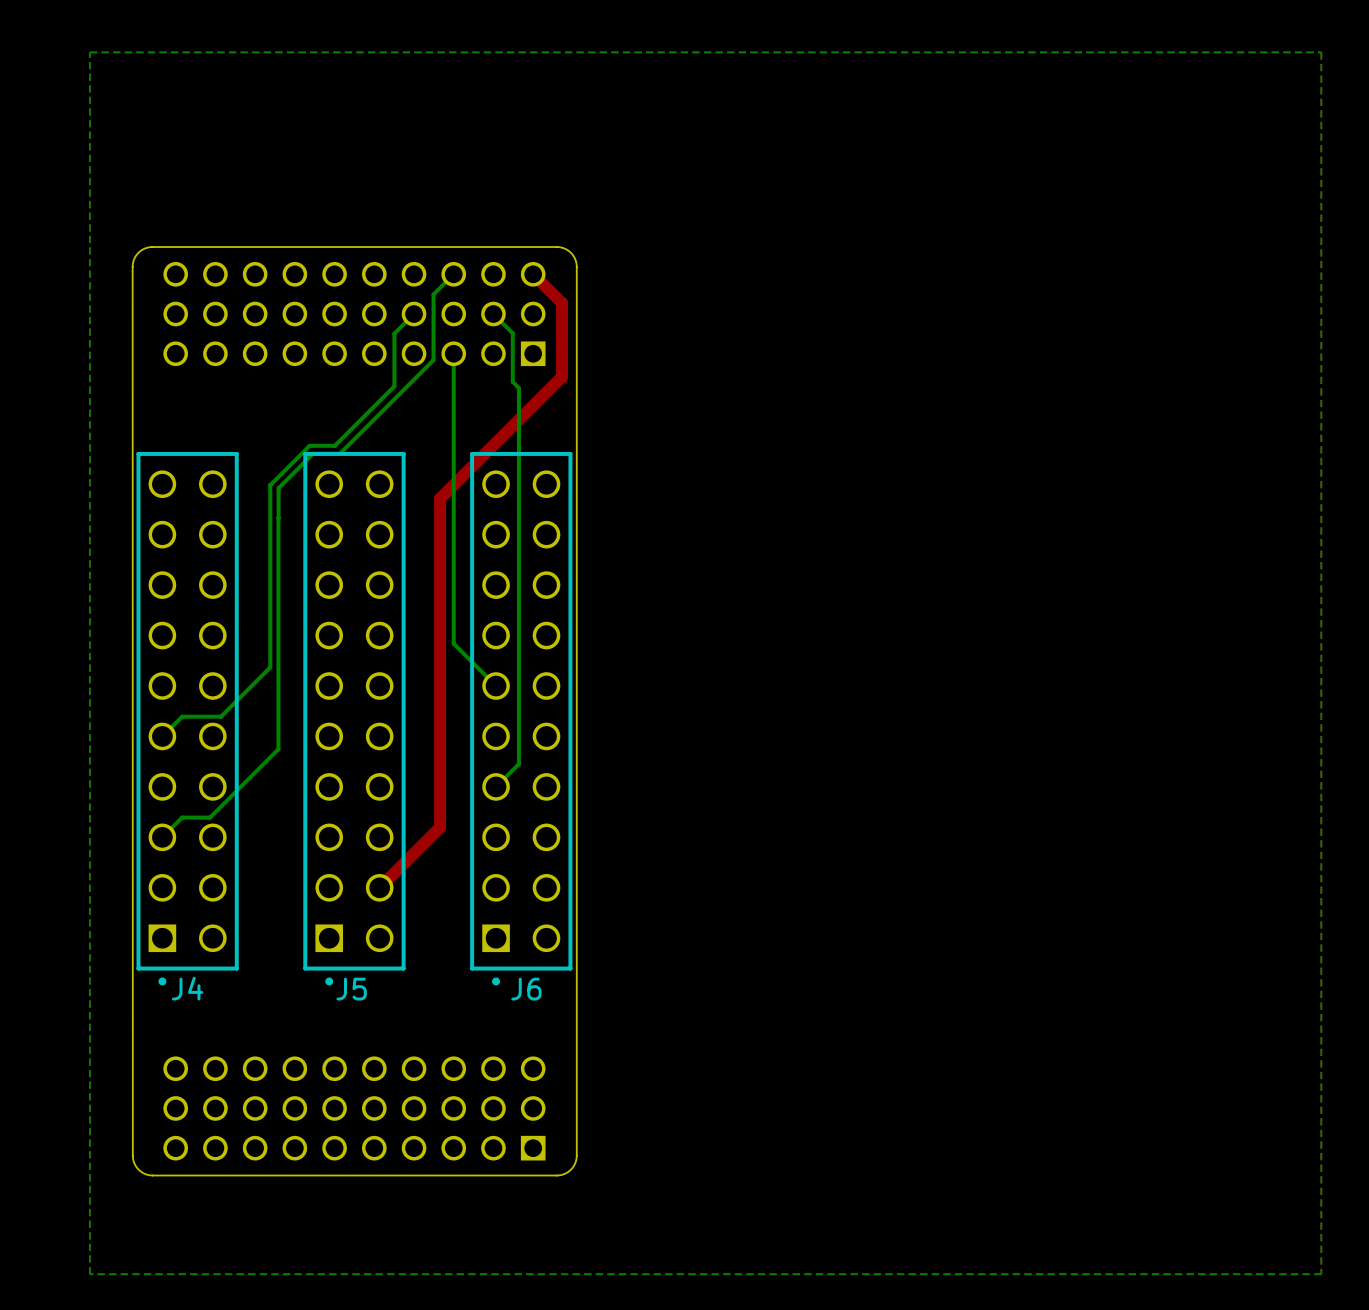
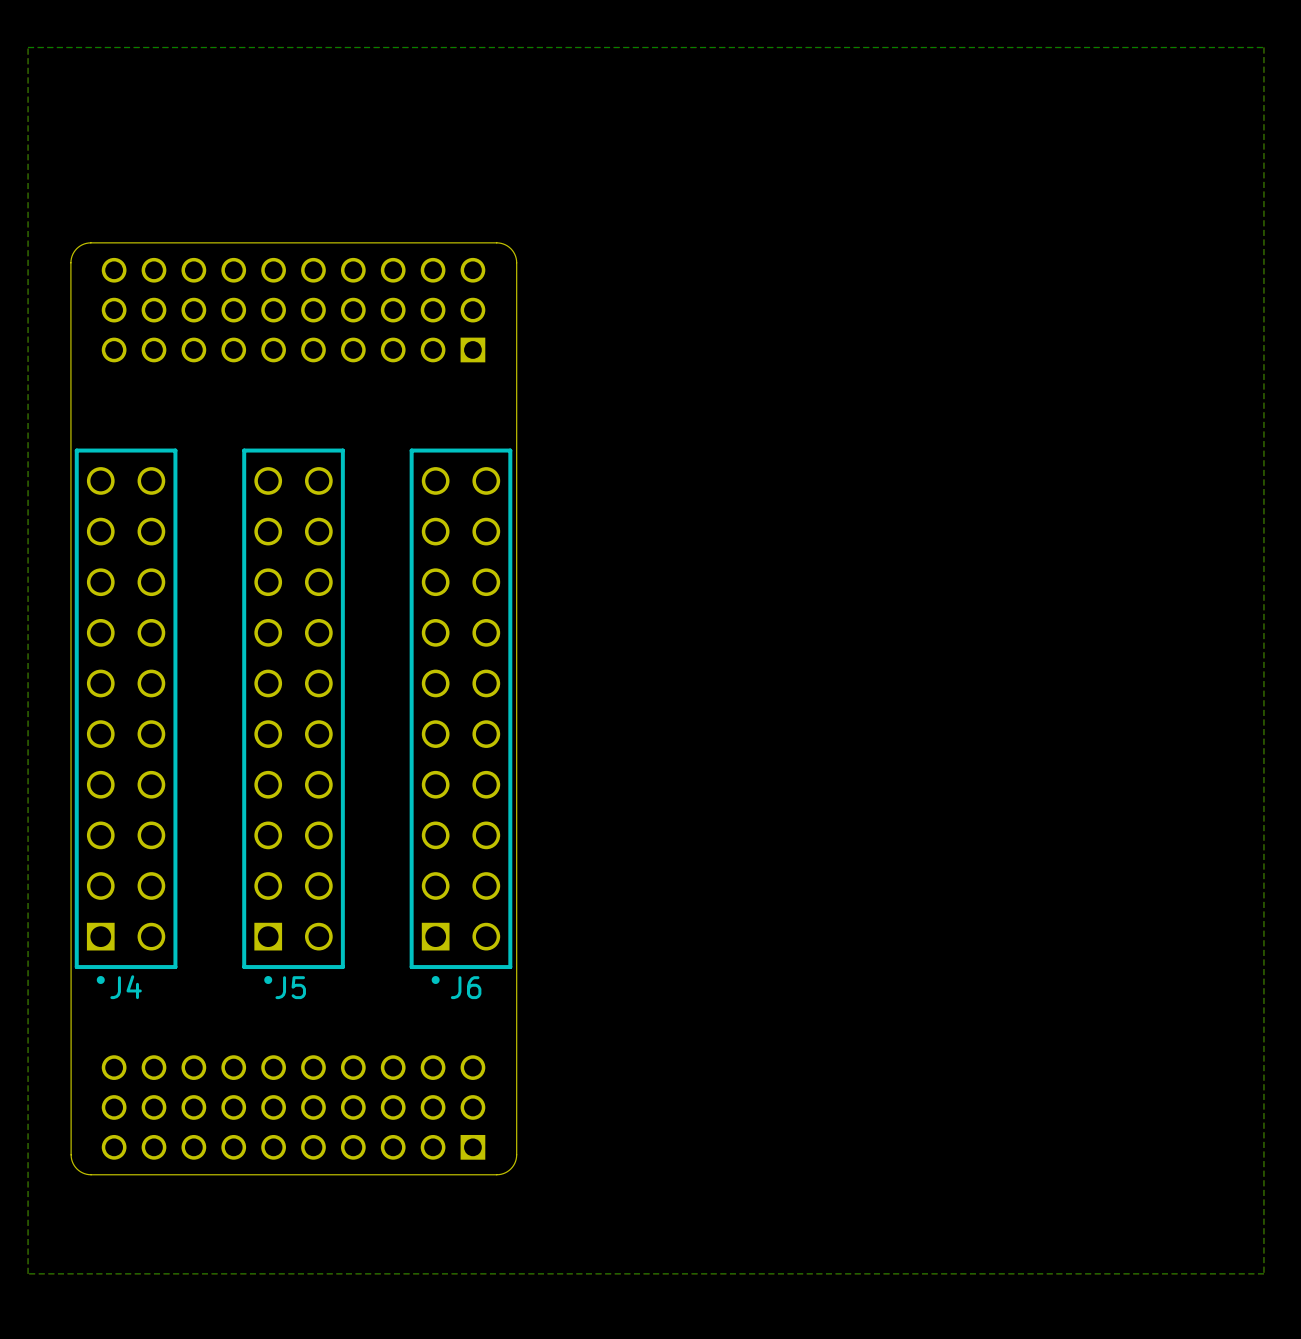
bottom track: (453, 274) (433, 294) (433, 360) (339, 453) (312, 453) (278, 488) (278, 518) -> none
top track: (533, 274) (562, 303) (562, 376) (440, 498) (440, 827) (379, 887) -> none
bottom track: (414, 314) (394, 333) (394, 386) (334, 445) (309, 445) (270, 485) (270, 667) (221, 716) (182, 716) (162, 736) -> none
bottom track: (493, 314) (512, 333) (512, 381) (518, 388) (518, 764) (496, 786) -> none
bottom track: (453, 353) (453, 643) (496, 686) -> none
bottom track: (278, 518) (278, 749) (210, 817) (182, 817) (162, 837) -> none

